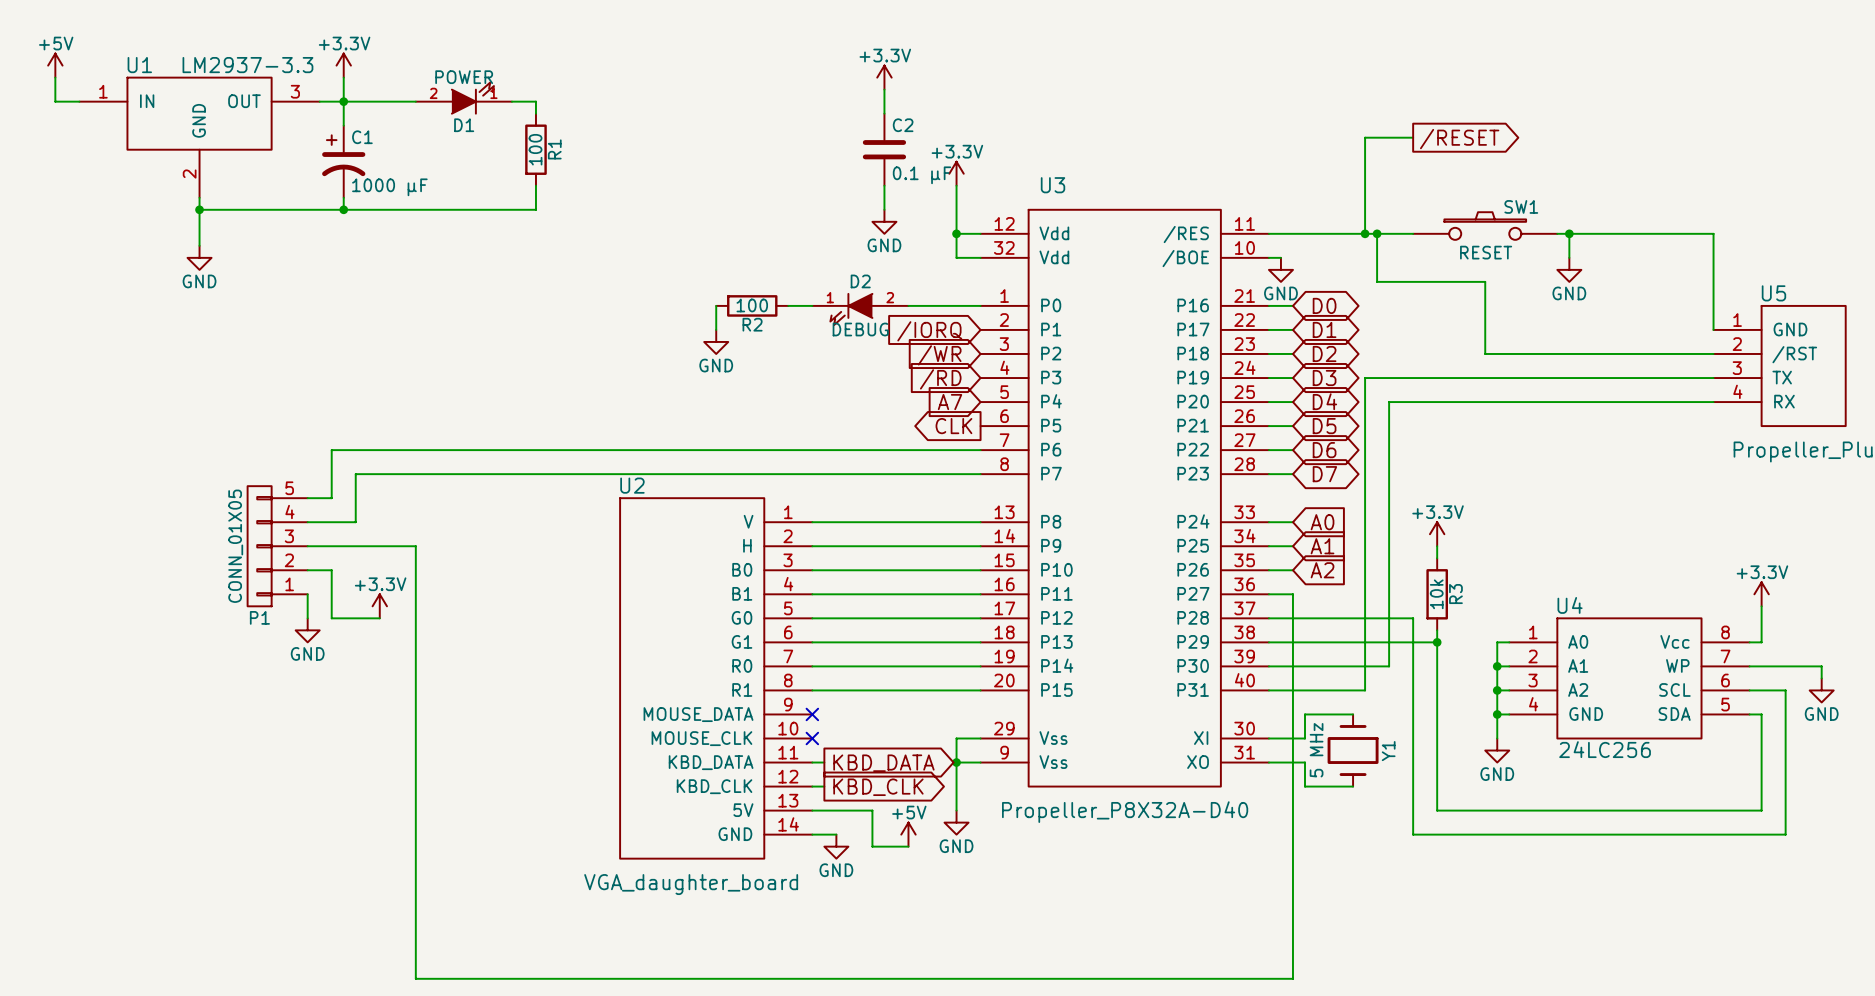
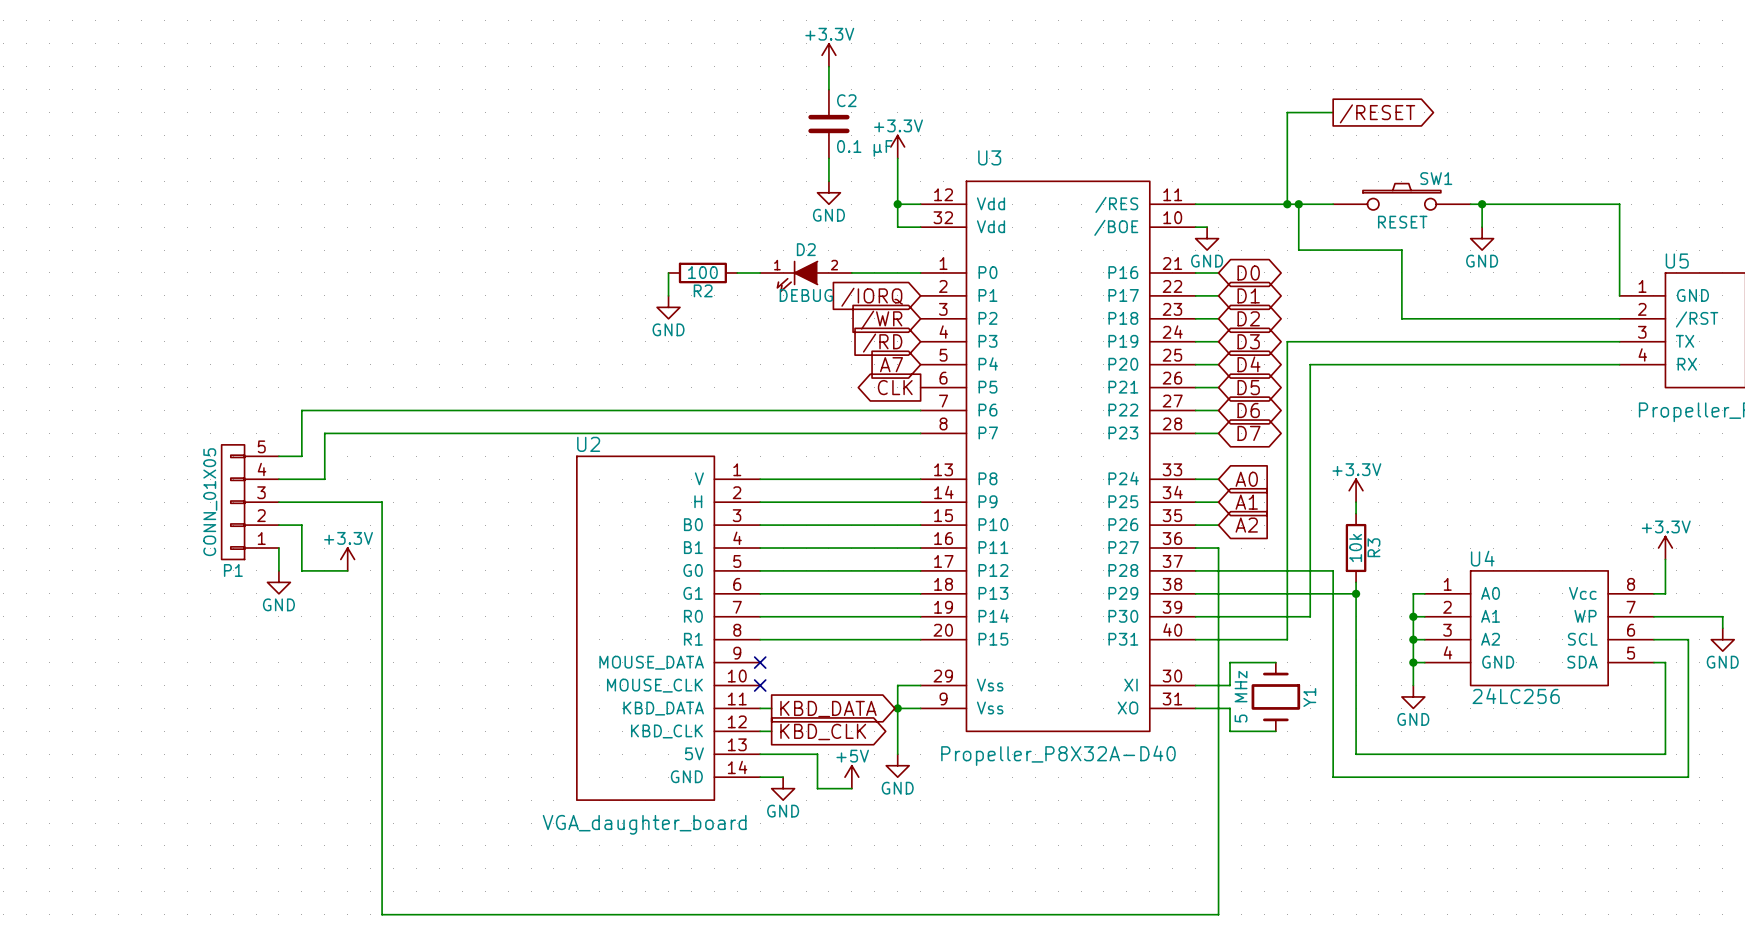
power symbol: +5V (55, 65) -> none
power symbol: +3.3V (343, 65) -> none
wire: (55, 77) (55, 101) (79, 101) -> none
wire: (343, 77) (343, 125) -> none
D1: POWER (463, 98) -> none
wire: (319, 101) (415, 101) -> none
junction: (343, 101) -> none
wire: (511, 101) (535, 101) (535, 113) -> none
U1: LM2937-3.3 (199, 137) -> none
R1: 100 (535, 149) -> none
C1: 1000 µF (343, 161) -> none
wire: (535, 185) (535, 209) (199, 209) -> none
wire: (199, 197) (199, 245) -> none
wire: (343, 197) (343, 209) -> none
junction: (199, 209) -> none
junction: (343, 209) -> none
power symbol: GND (199, 257) -> none

